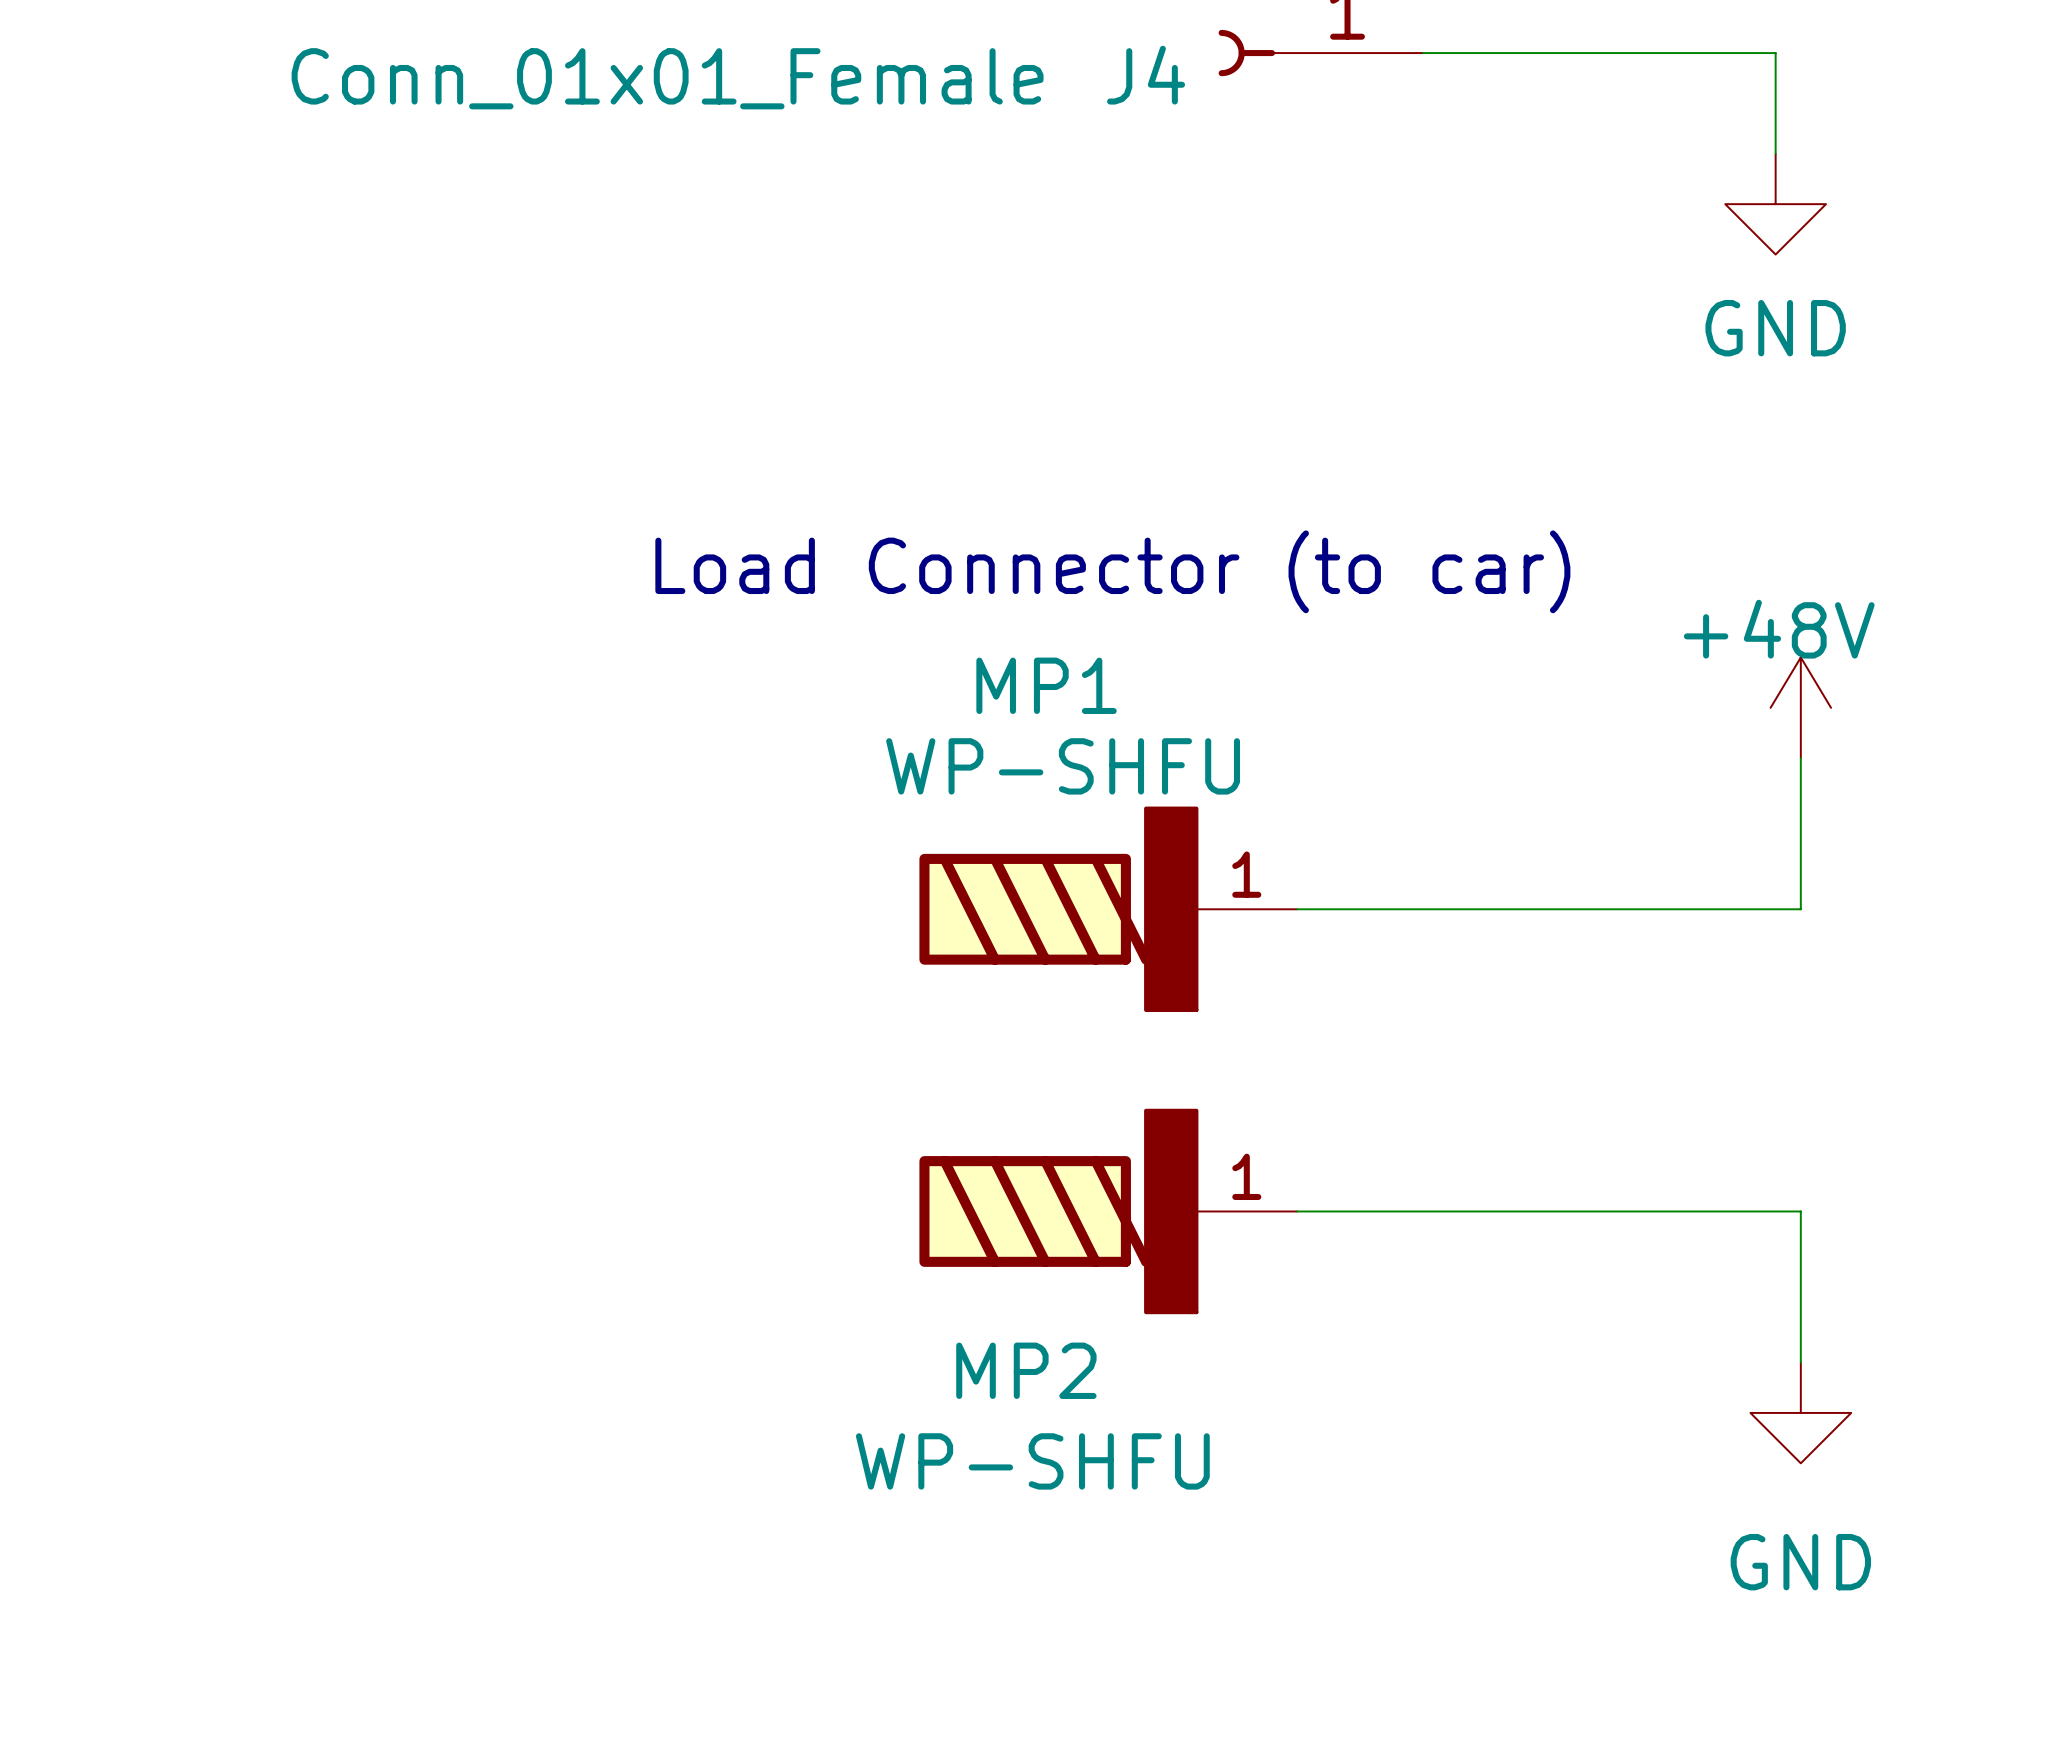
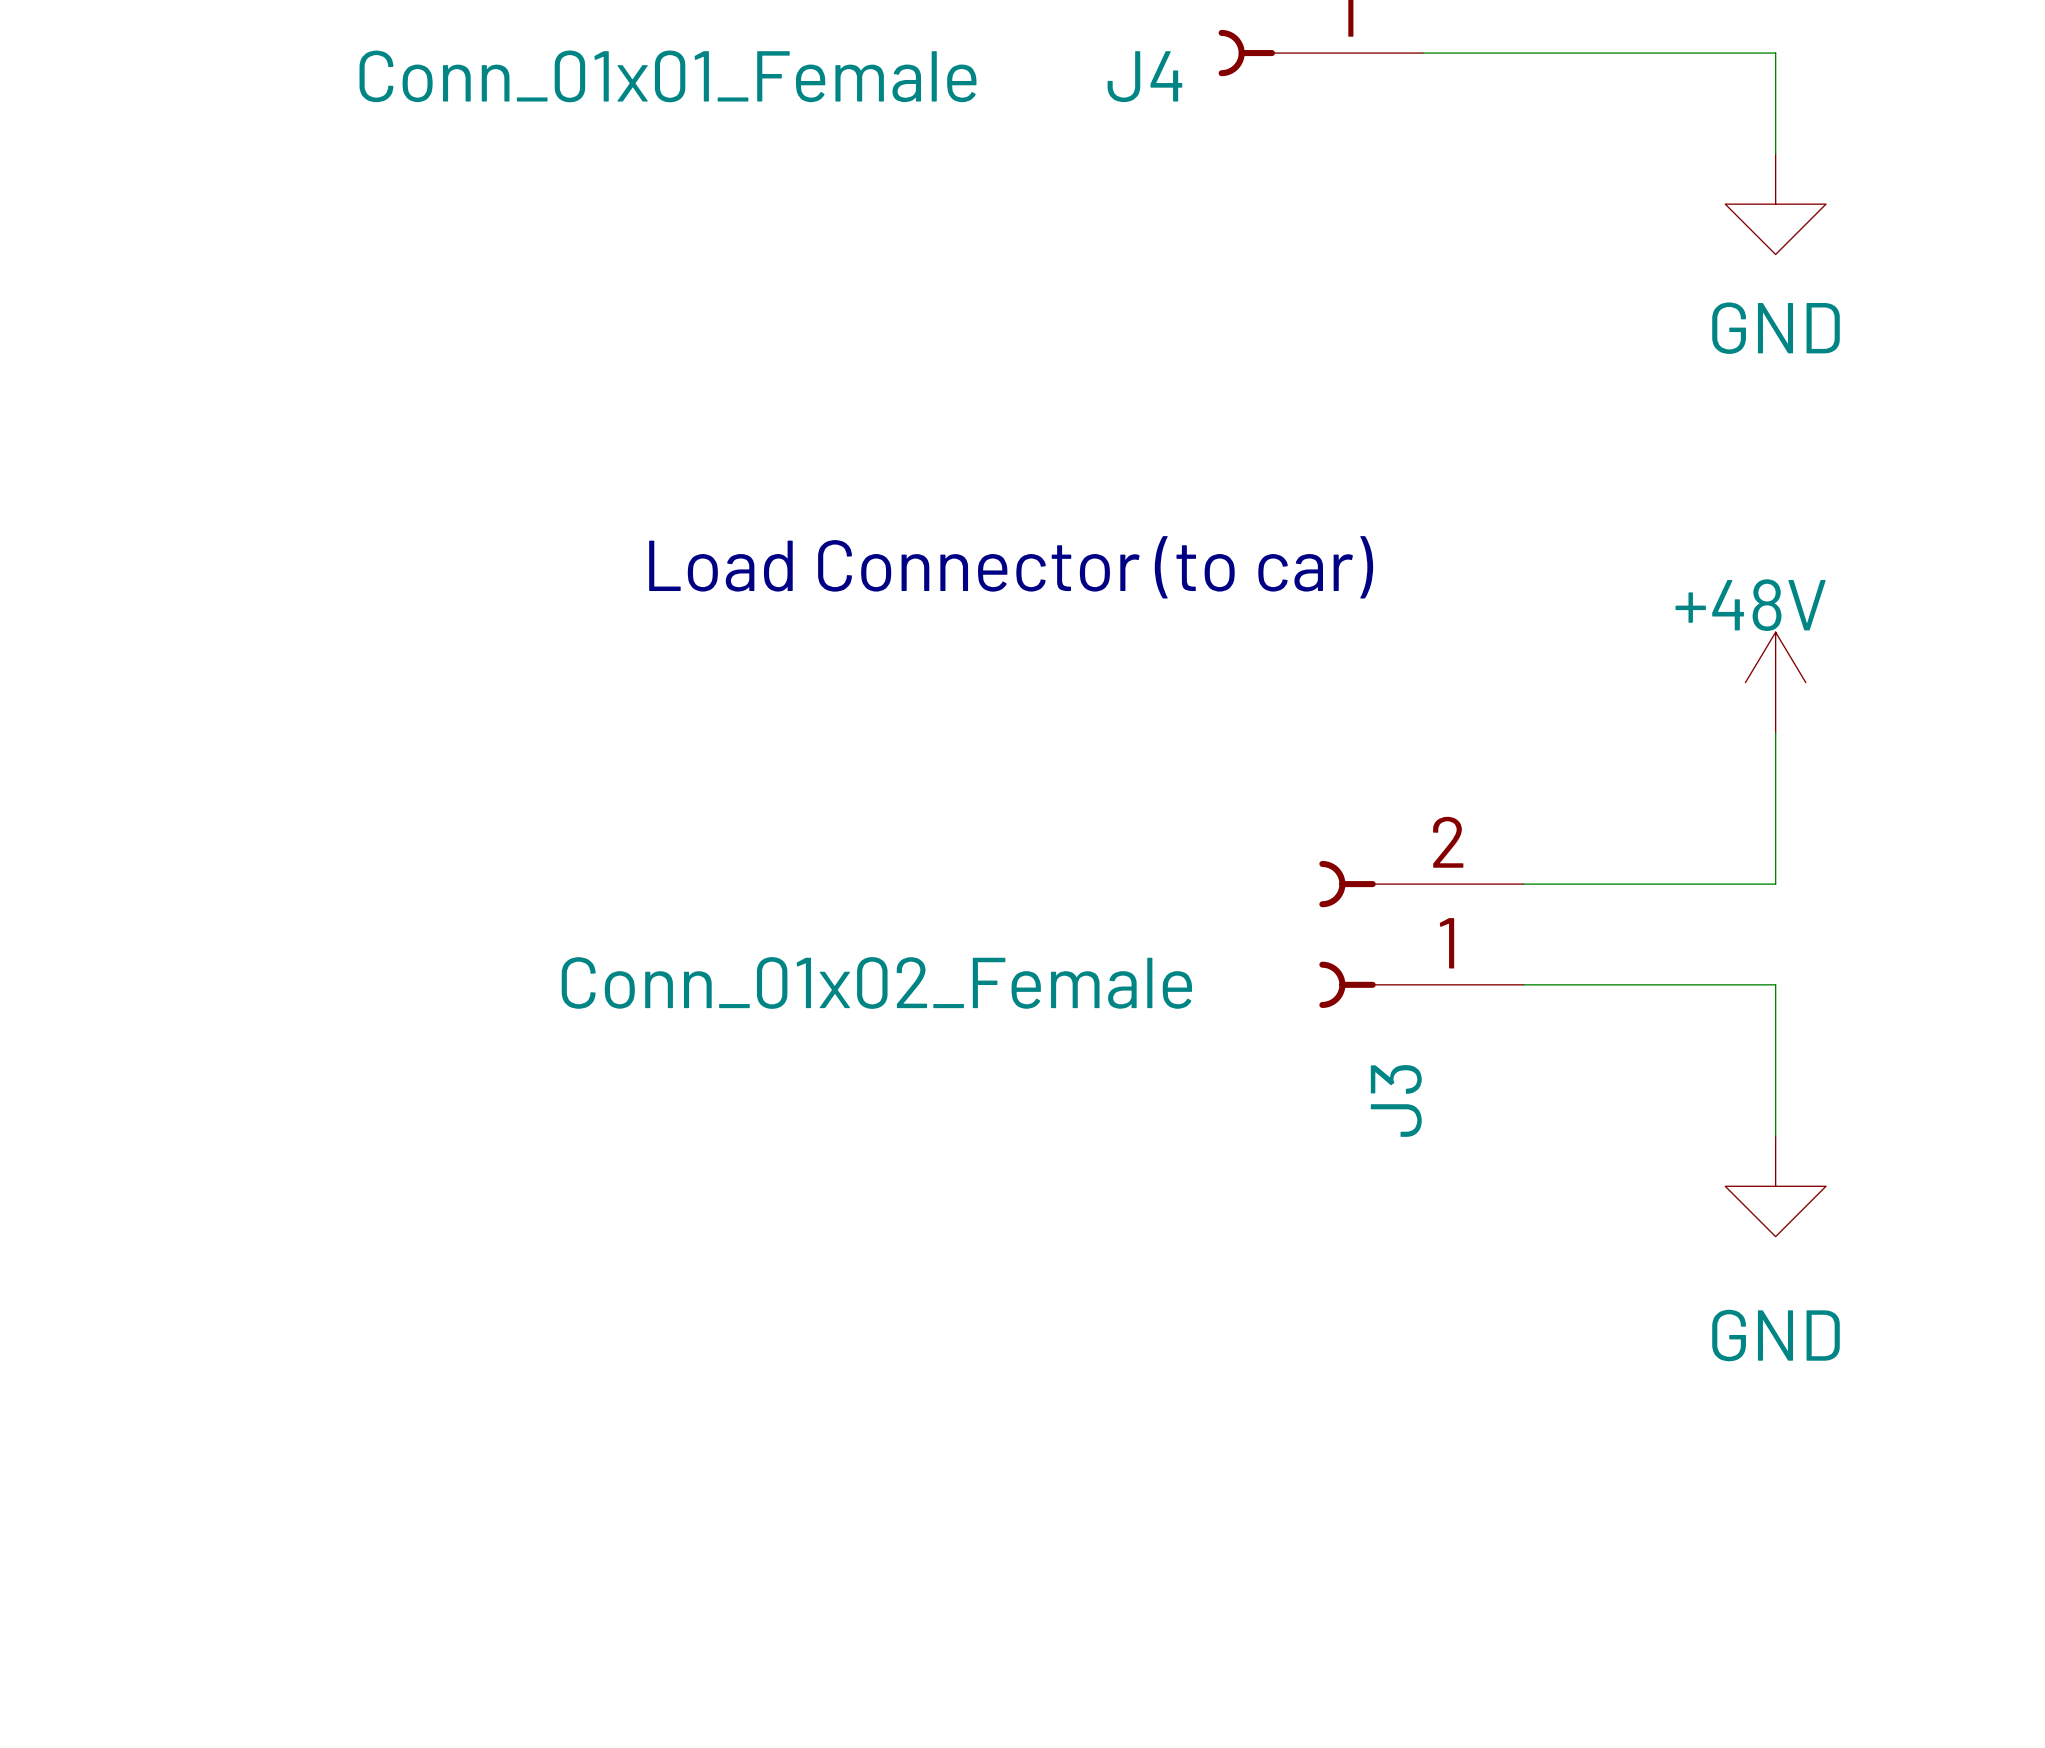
power symbol position: +48V (1800, 707) -> +48V (1775, 682)
wire: none -> (1775, 733) (1775, 884) (1523, 884)
wire: (1800, 758) (1800, 909) (1297, 909) -> none
MP1: WP-SHFU (1108, 909) -> none
J3: none -> Conn_01x02_Female (1421, 934)
wire: none -> (1523, 984) (1775, 984) (1775, 1135)
MP2: WP-SHFU (1108, 1211) -> none
wire: (1297, 1211) (1800, 1211) (1800, 1362) -> none
power symbol position: GND (1800, 1412) -> GND (1775, 1186)

